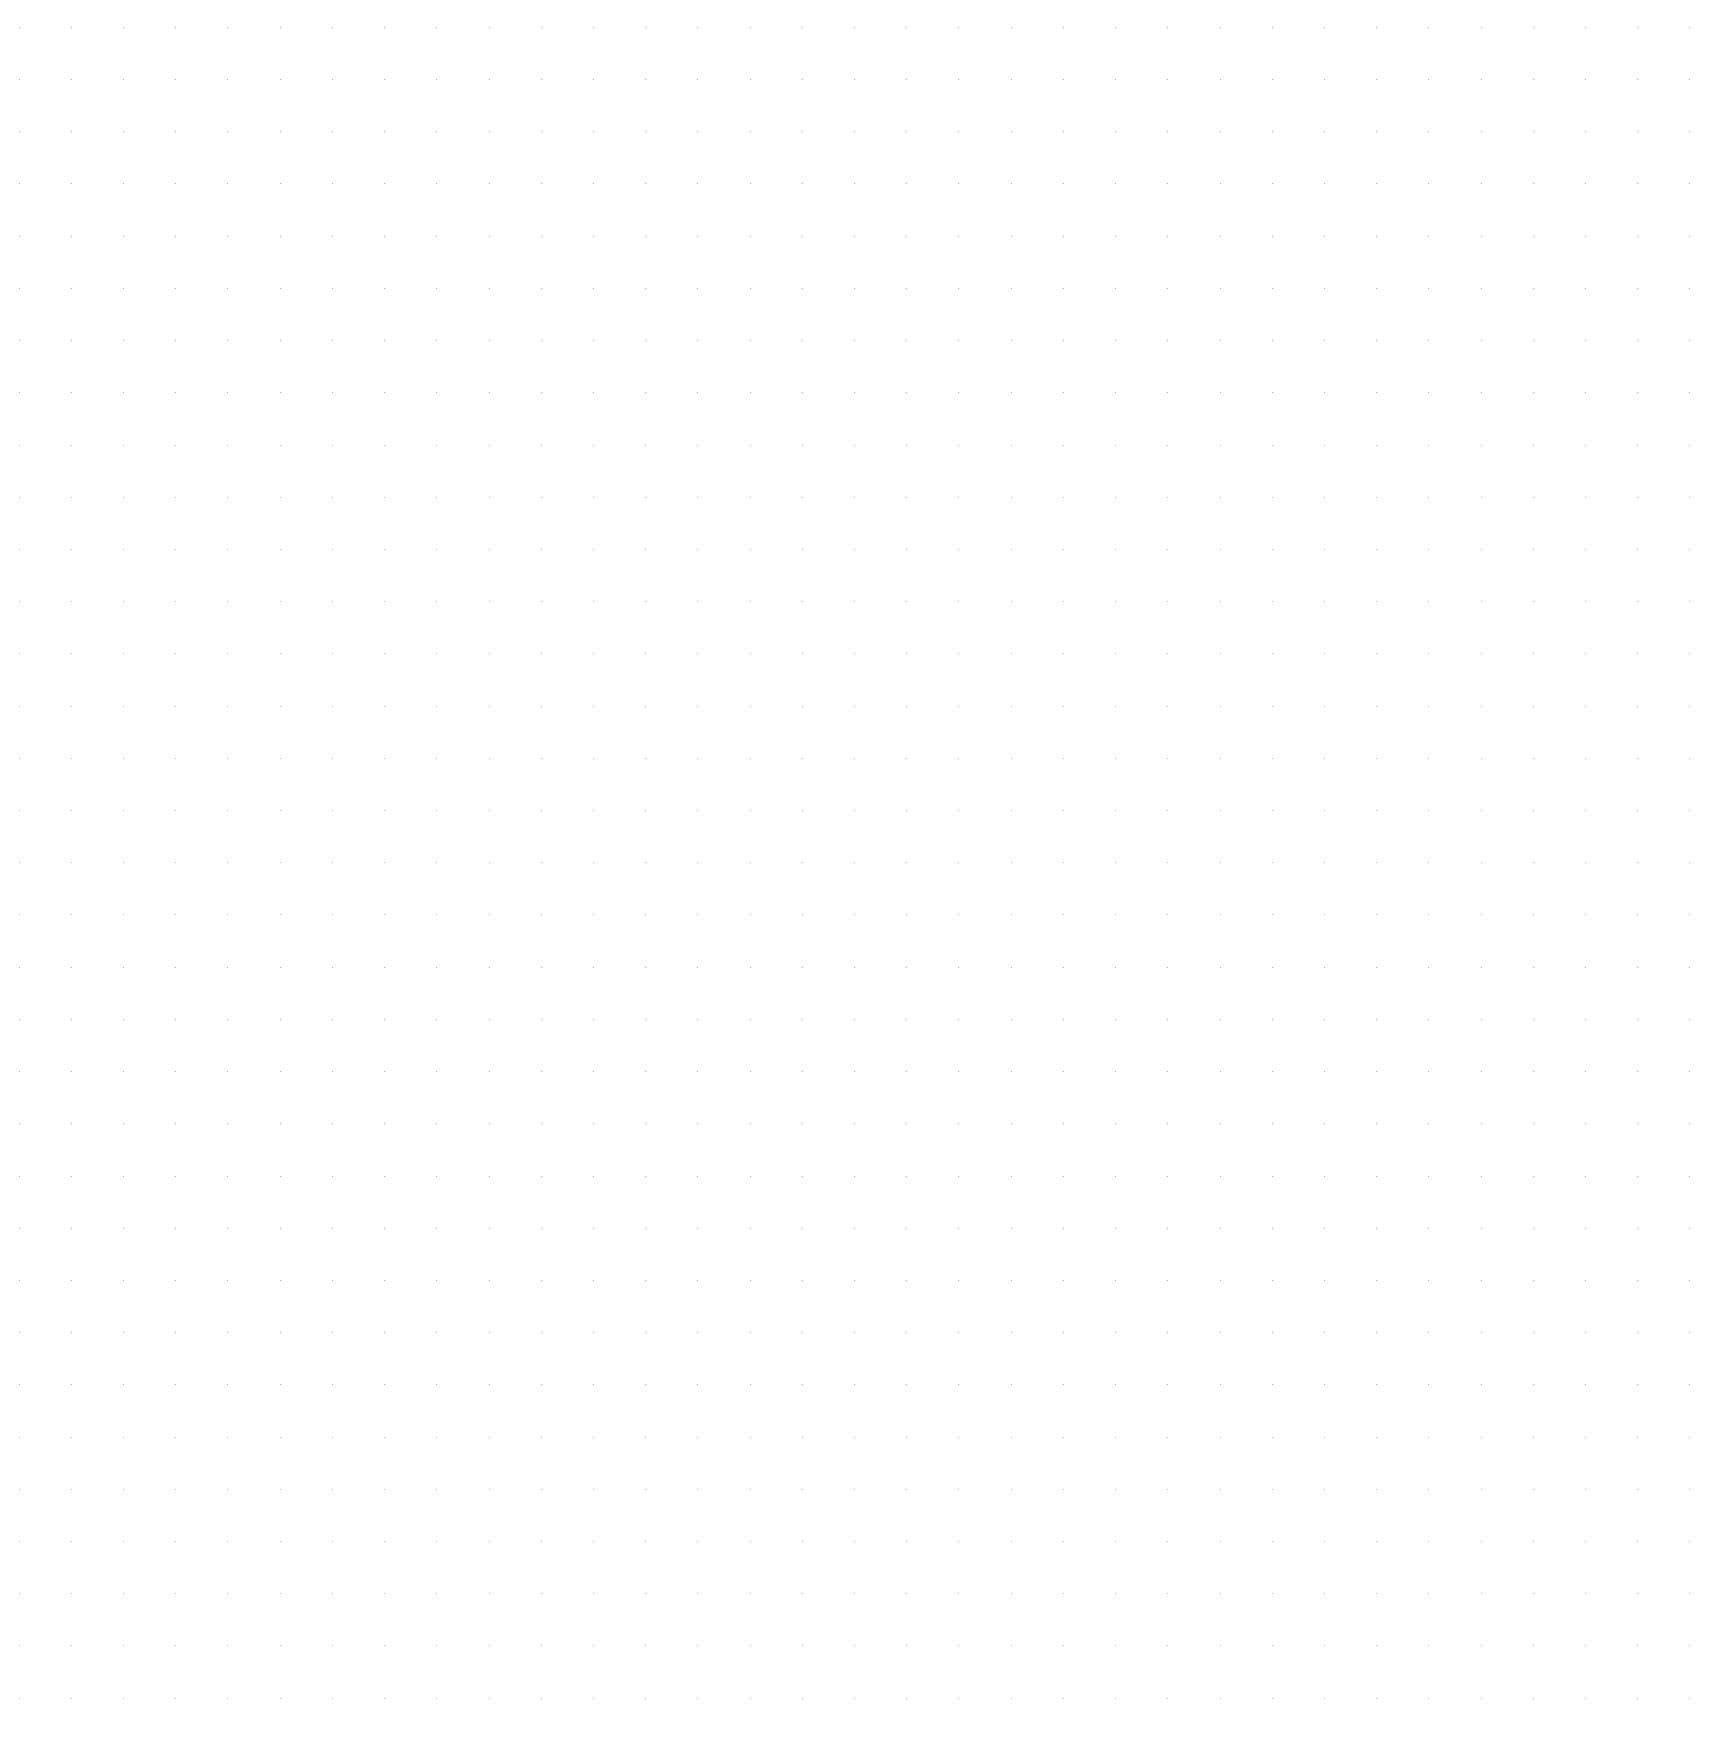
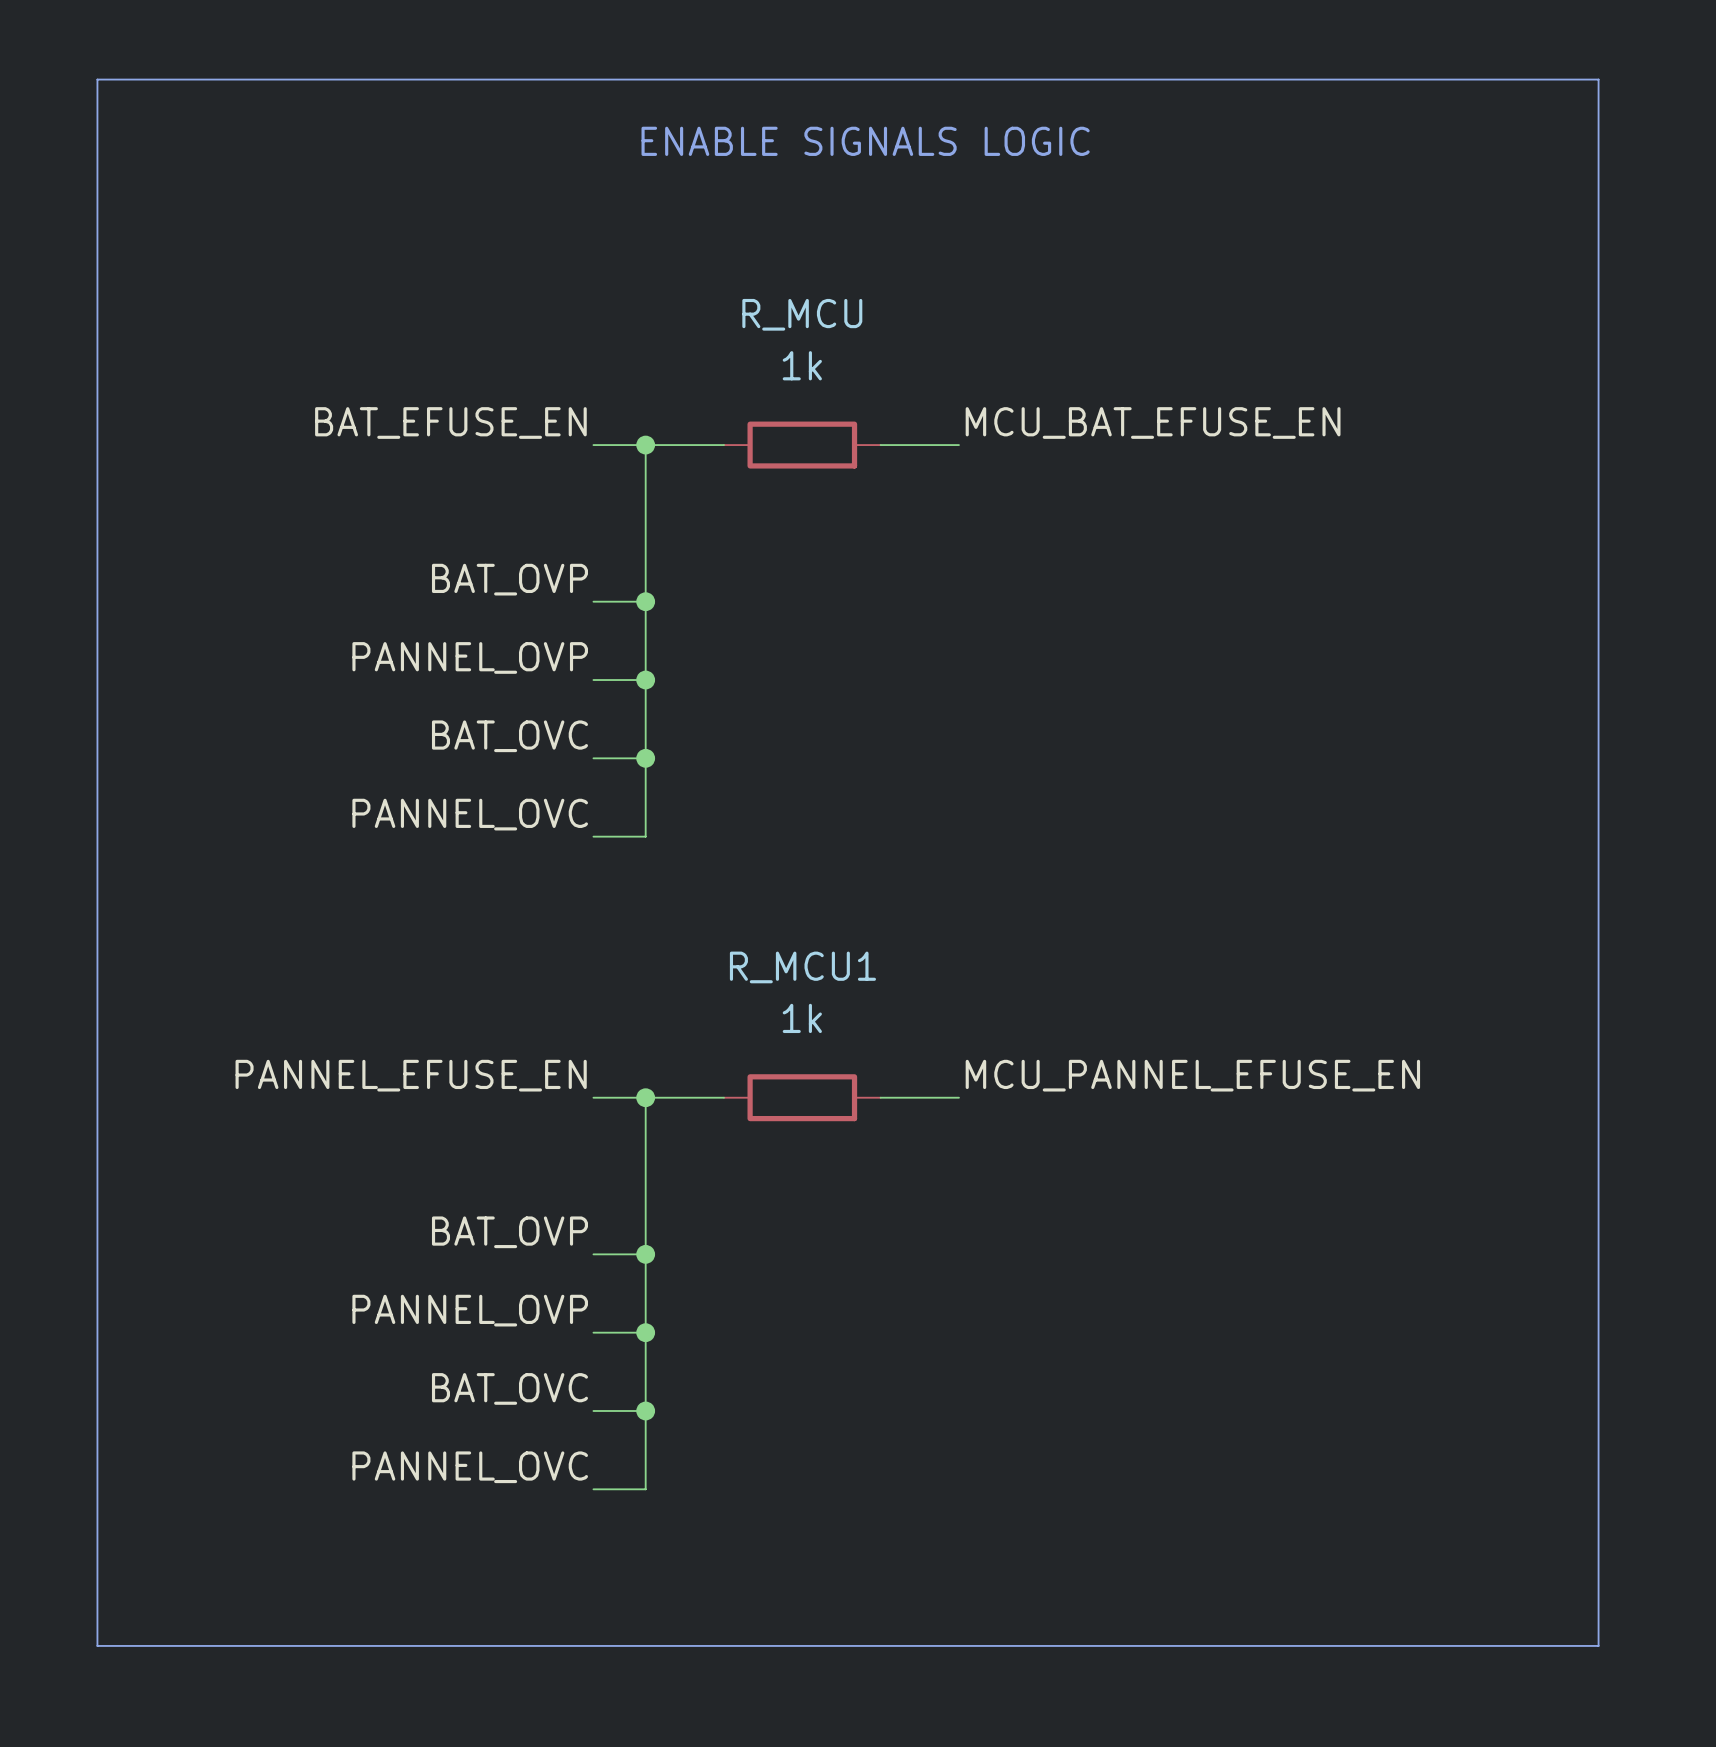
line: none -> (97, 79) (1598, 79) (1598, 1645) (97, 1645) (97, 79)
text: none -> ENABLE SIGNALS LOGIC (865, 141)
label: none -> BAT_EFUSE_EN (450, 423)
label: none -> MCU_BAT_EFUSE_EN (1153, 423)
wire: none -> (593, 445) (724, 445)
wire: none -> (645, 445) (645, 836) (593, 836)
junction: none -> (645, 445)
R_MCU: none -> 1k (802, 445)
wire: none -> (880, 445) (958, 445)
label: none -> BAT_OVP (509, 579)
wire: none -> (593, 601) (645, 601)
junction: none -> (645, 601)
label: none -> PANNEL_OVP (470, 657)
wire: none -> (593, 680) (645, 680)
junction: none -> (645, 680)
label: none -> BAT_OVC (509, 736)
wire: none -> (593, 758) (645, 758)
junction: none -> (645, 758)
label: none -> PANNEL_OVC (470, 814)
label: none -> PANNEL_EFUSE_EN (411, 1075)
label: none -> MCU_PANNEL_EFUSE_EN (1192, 1075)
wire: none -> (593, 1097) (724, 1097)
wire: none -> (645, 1097) (645, 1489) (593, 1489)
junction: none -> (645, 1097)
R_MCU1: none -> 1k (802, 1097)
wire: none -> (880, 1097) (958, 1097)
label: none -> BAT_OVP (509, 1232)
wire: none -> (593, 1254) (645, 1254)
junction: none -> (645, 1254)
label: none -> PANNEL_OVP (470, 1310)
wire: none -> (593, 1332) (645, 1332)
junction: none -> (645, 1332)
label: none -> BAT_OVC (509, 1388)
wire: none -> (593, 1410) (645, 1410)
junction: none -> (645, 1410)
label: none -> PANNEL_OVC (470, 1467)

